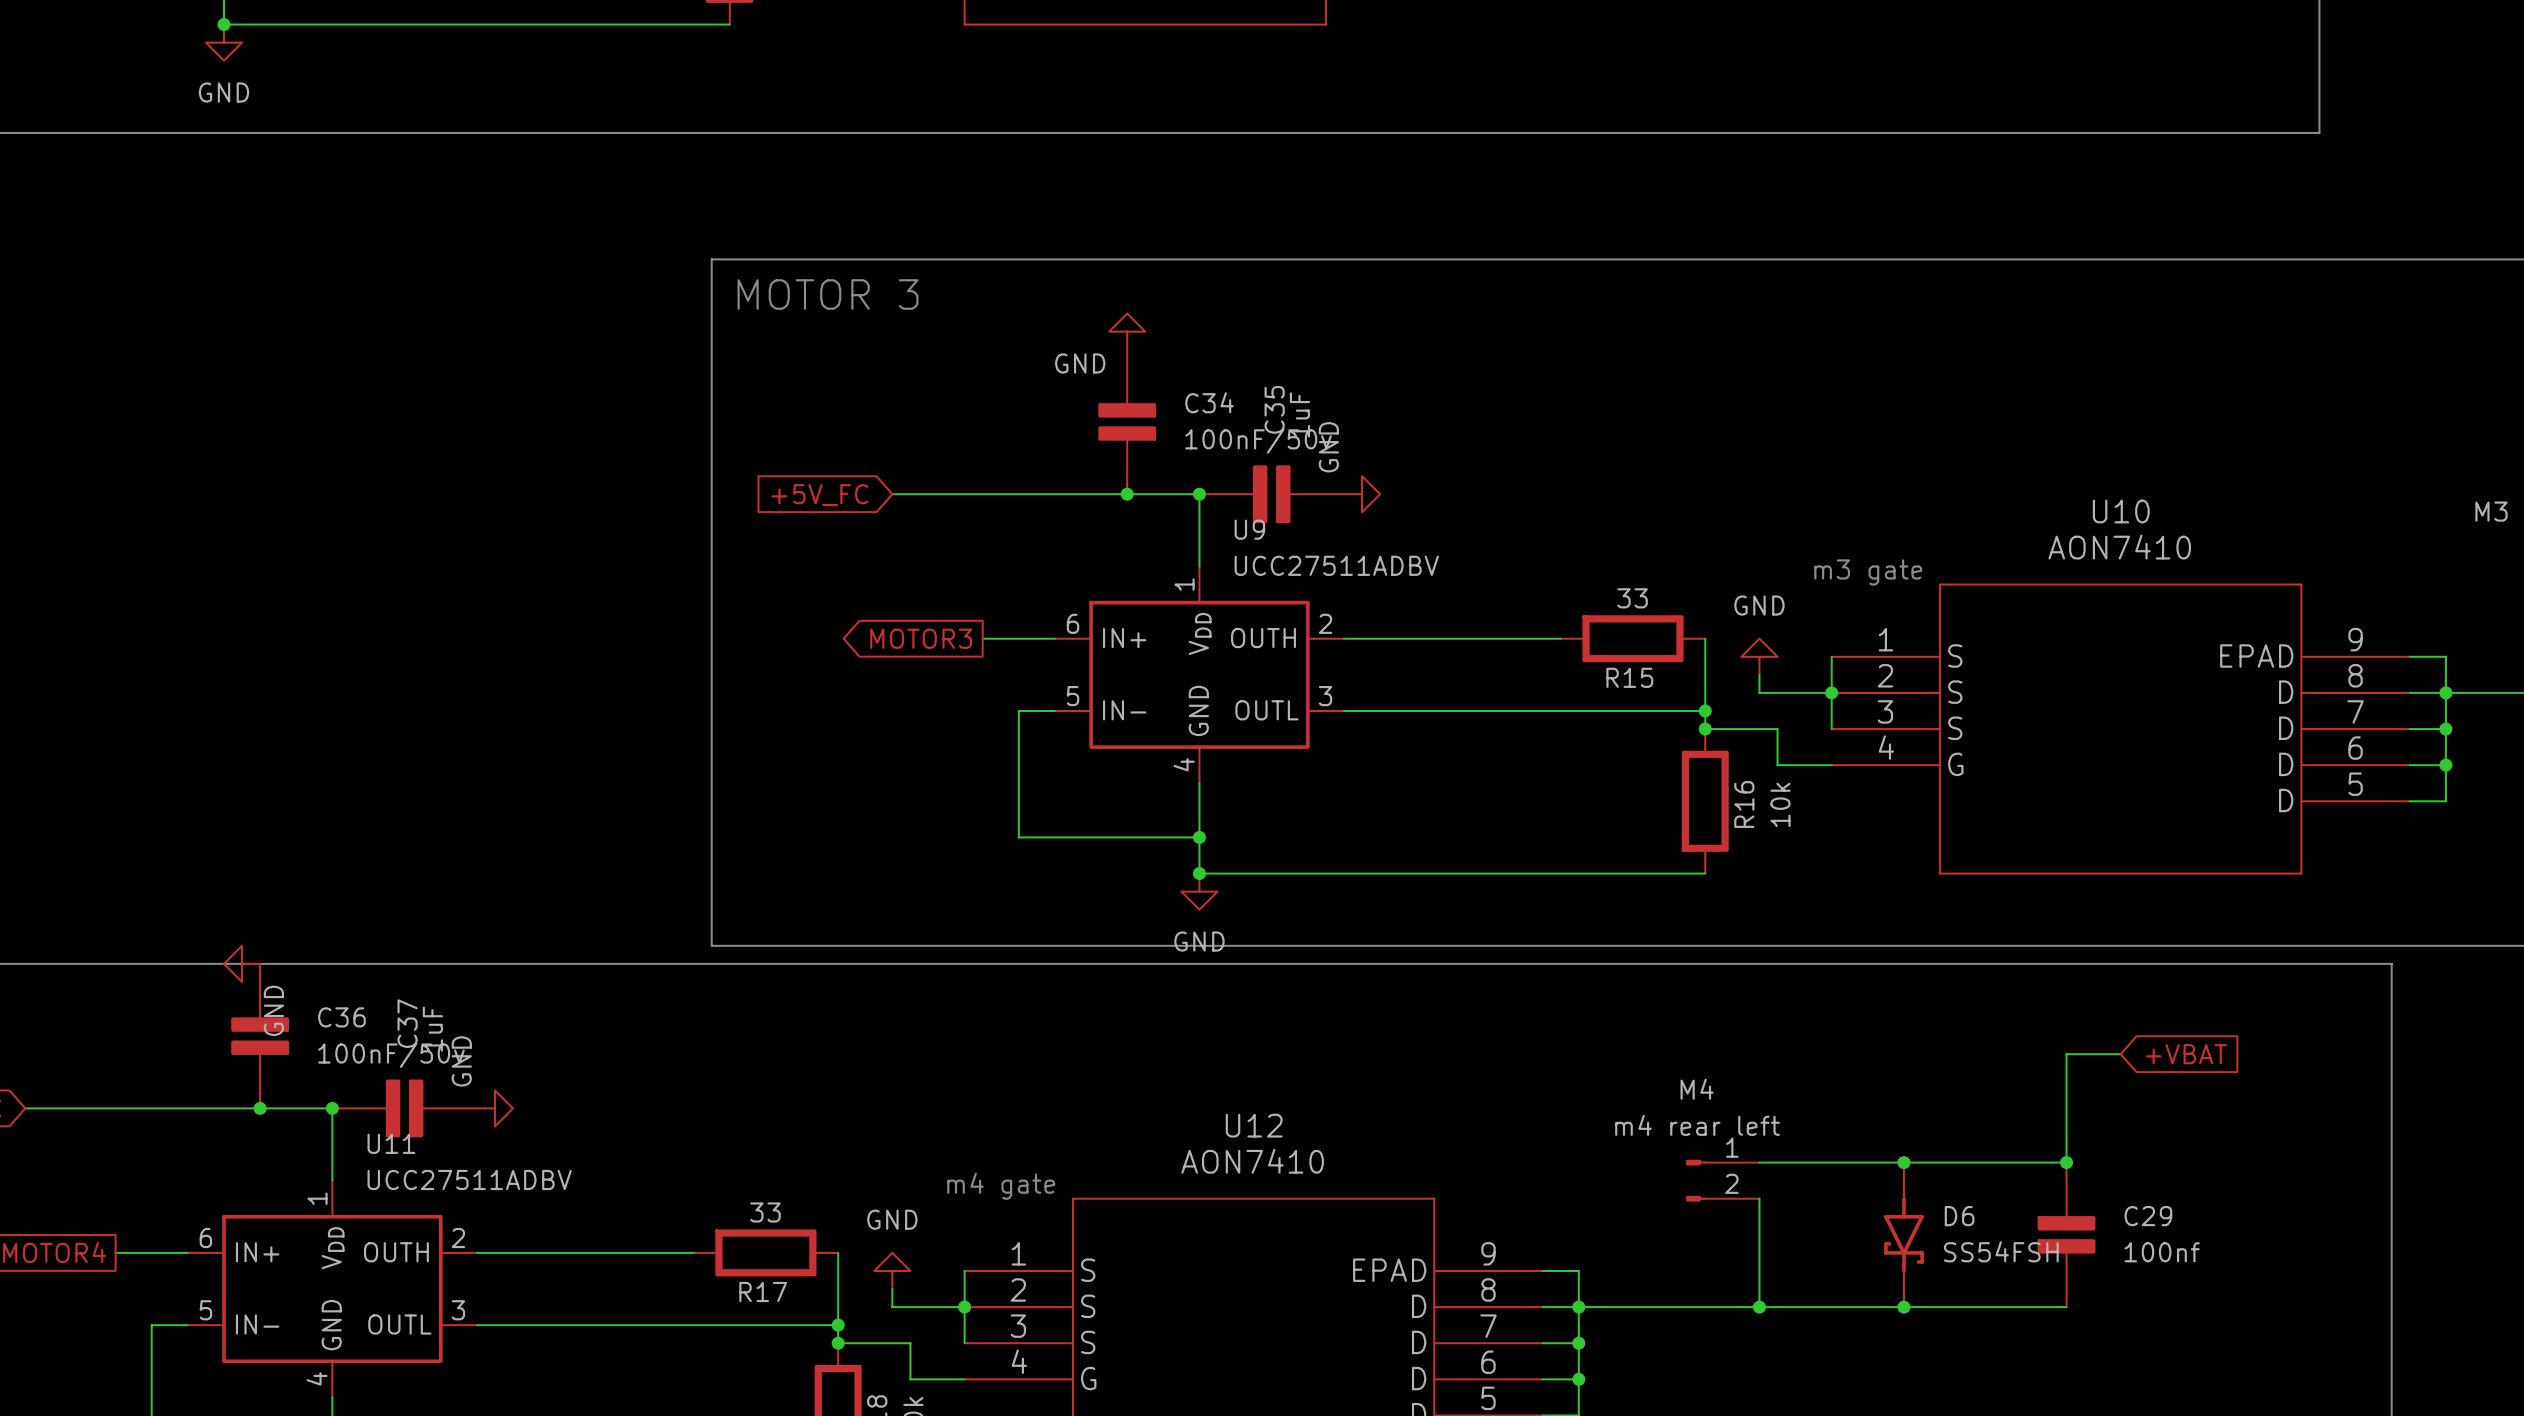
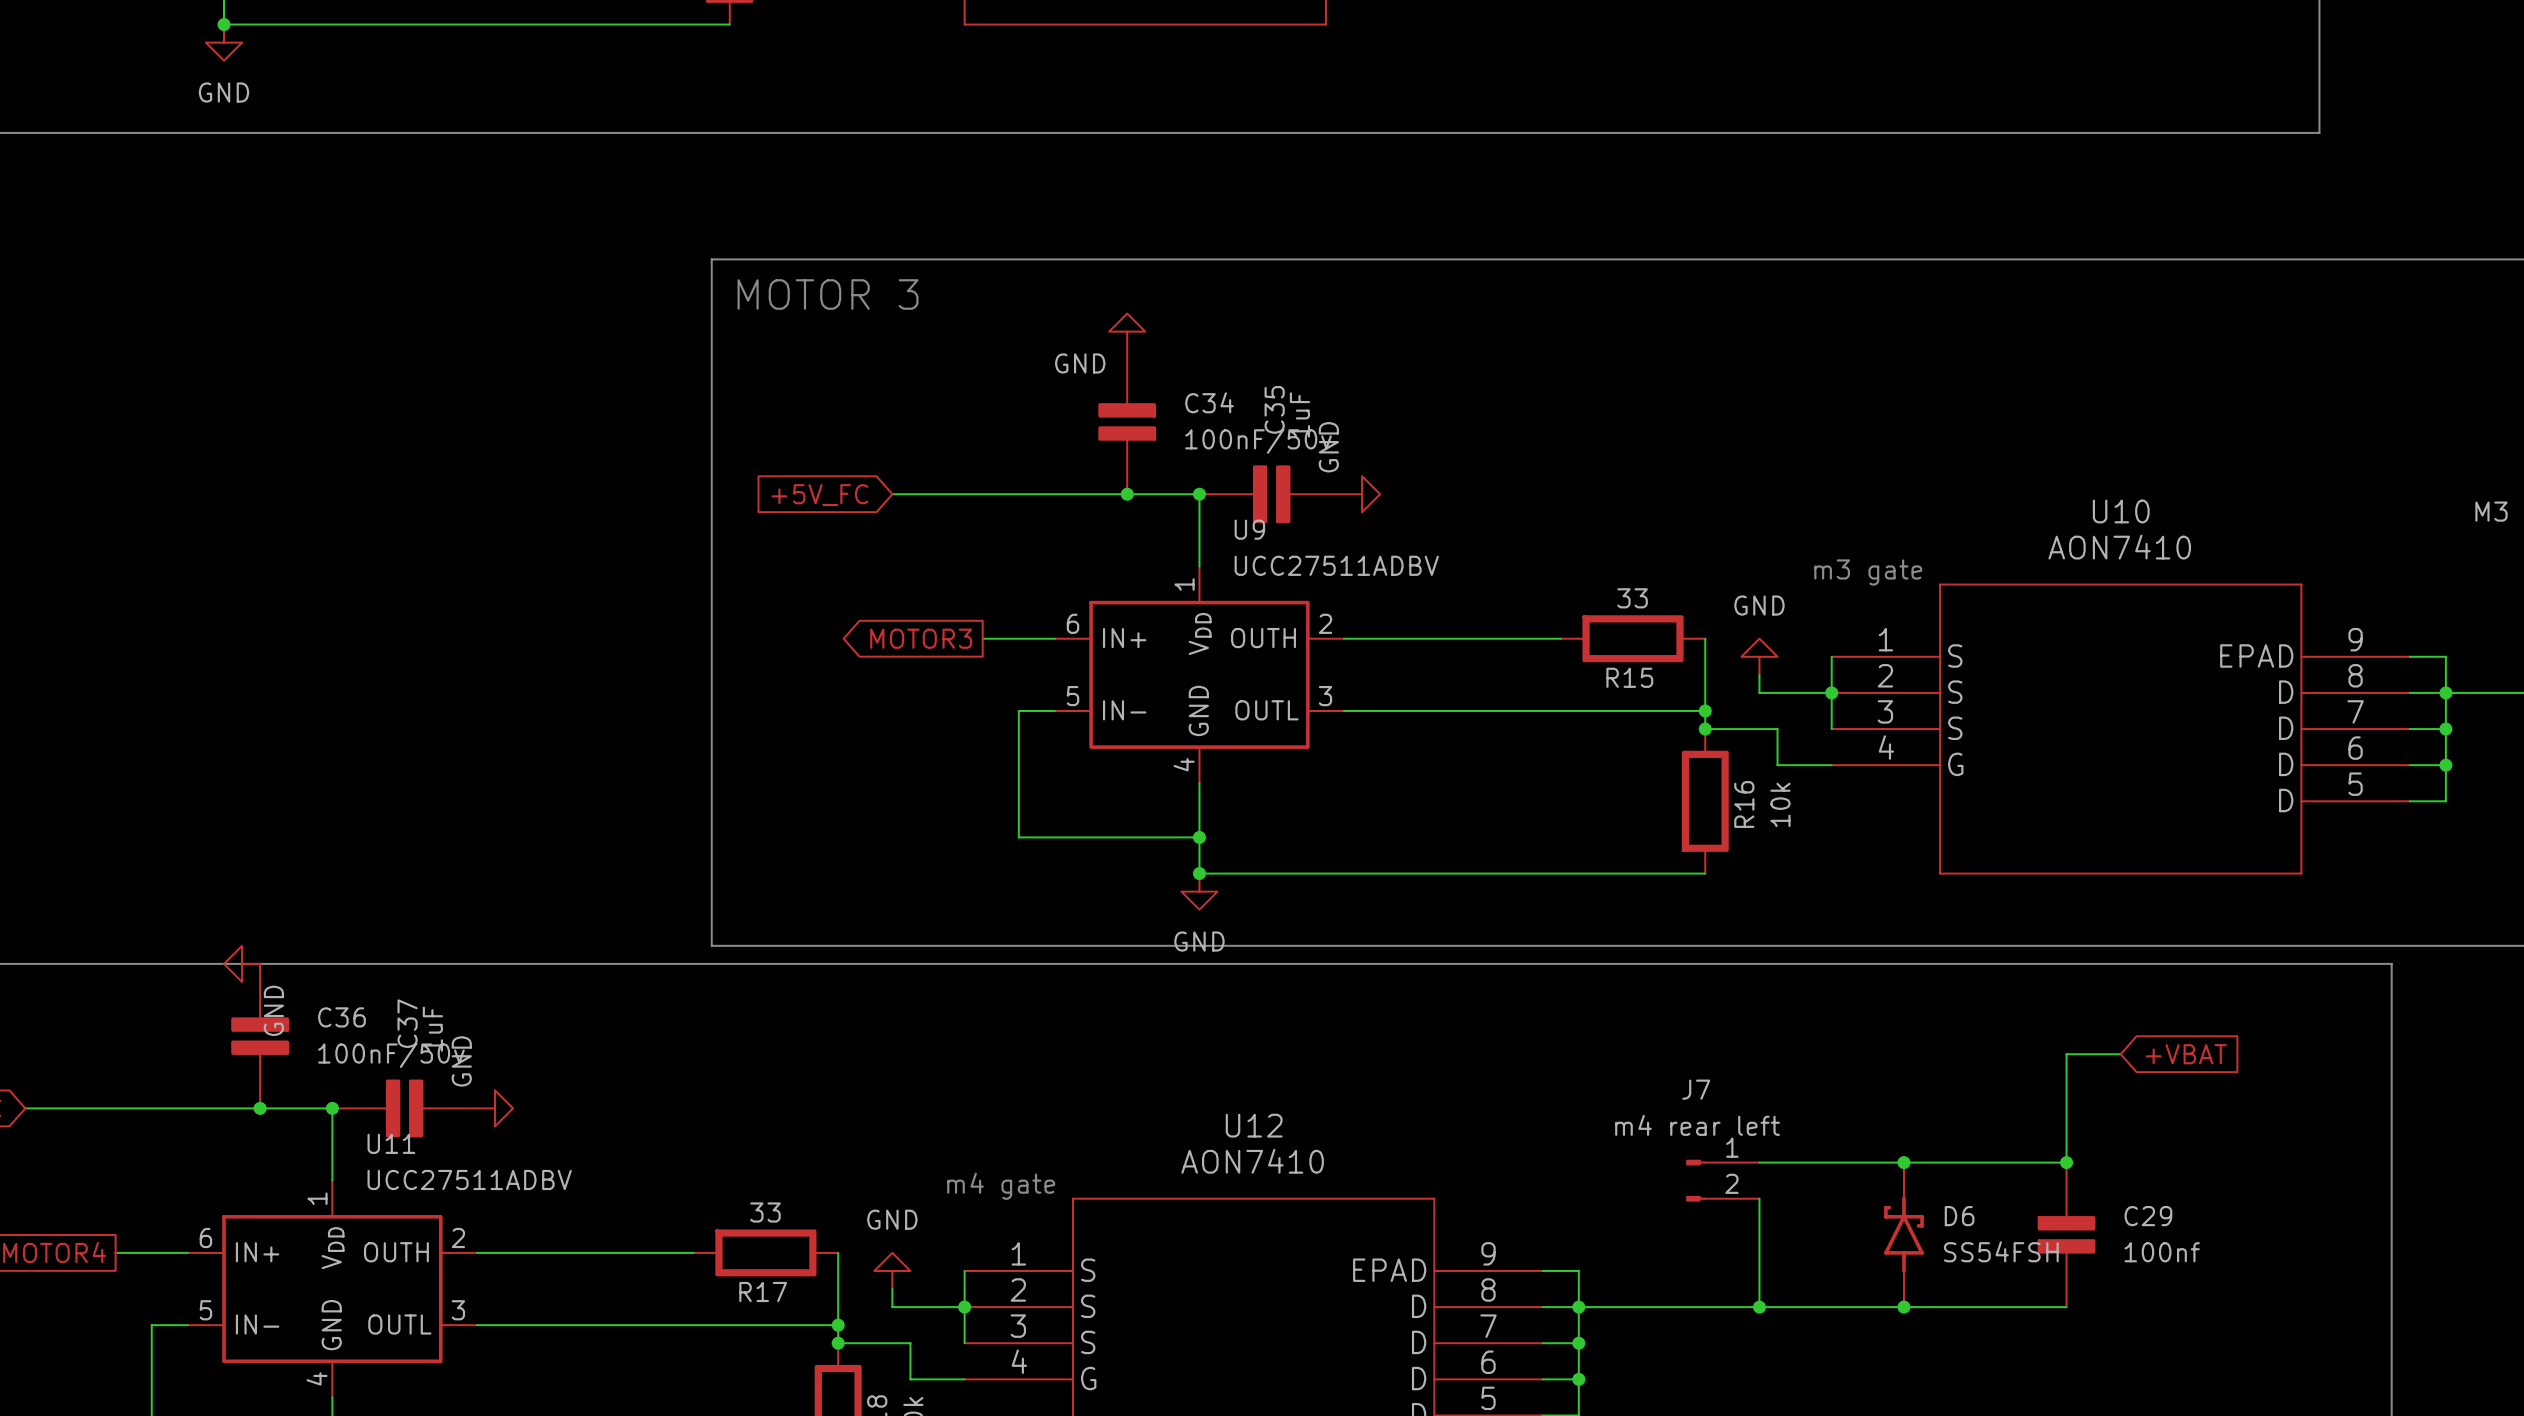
M4 name: M4 (1697, 1089) -> J7 (1696, 1089)
D6 rotation: 0° (1903, 1234) -> 180° (1903, 1234)

